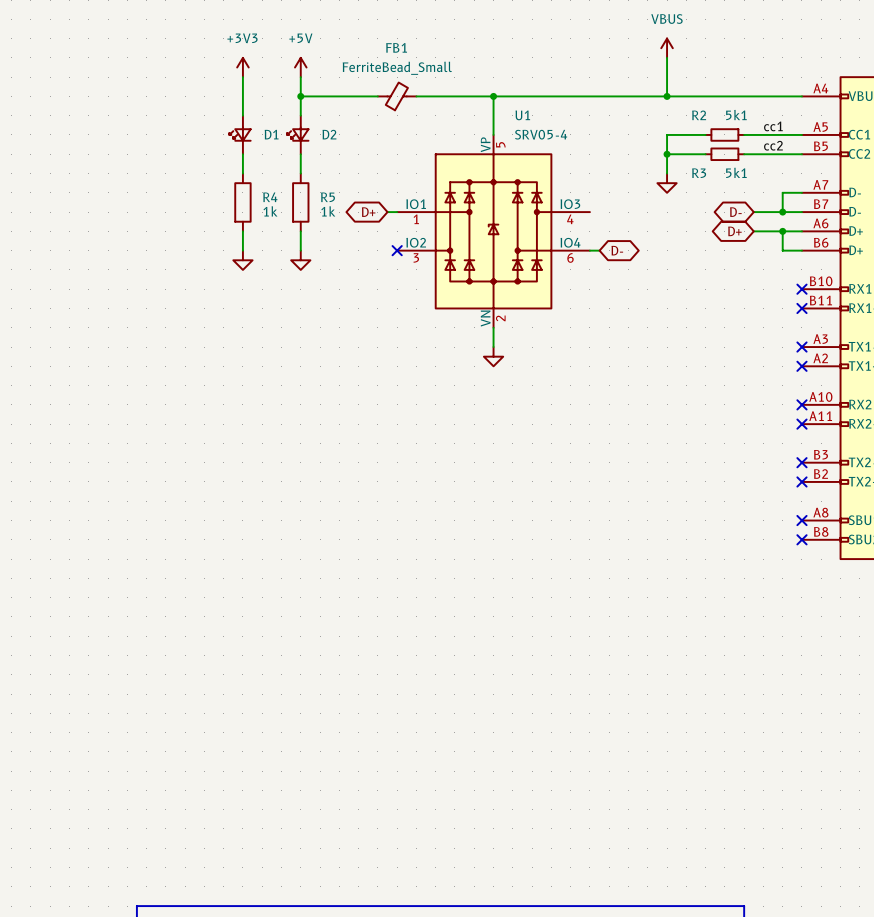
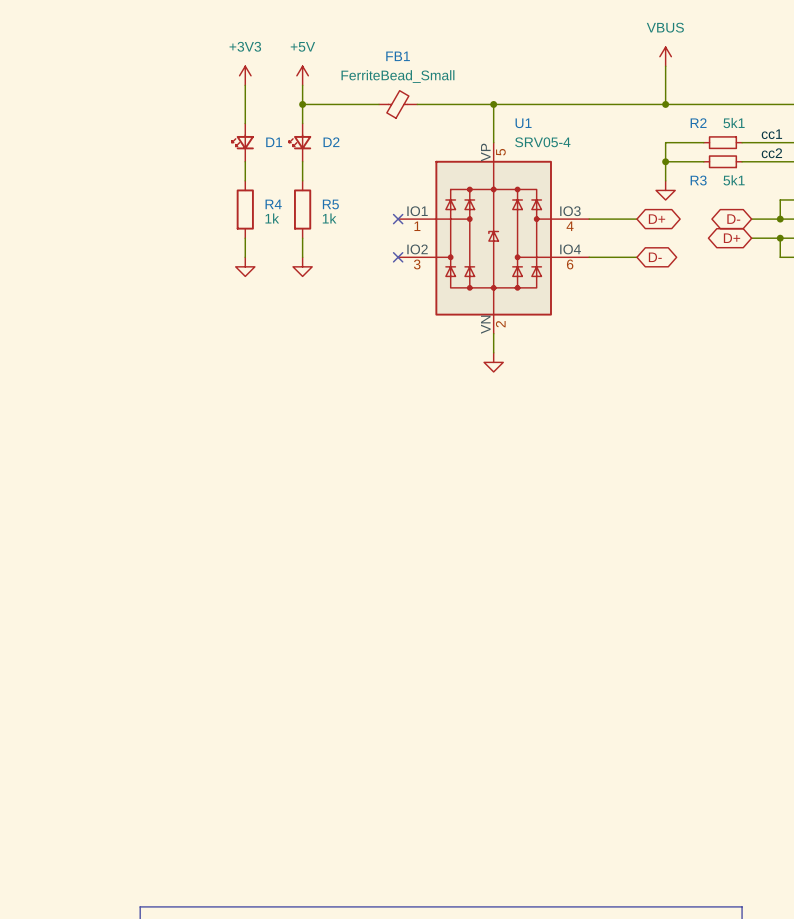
global label: D+ (368, 212) -> none
wire: (387, 212) (397, 212) -> none
no-connect mark: none -> (398, 219)
wire: none -> (589, 219) (636, 219)
global label: none -> D+ (657, 219)
wire: none -> (598, 257) (636, 257)
global label position: D- (617, 250) -> D- (655, 257)

